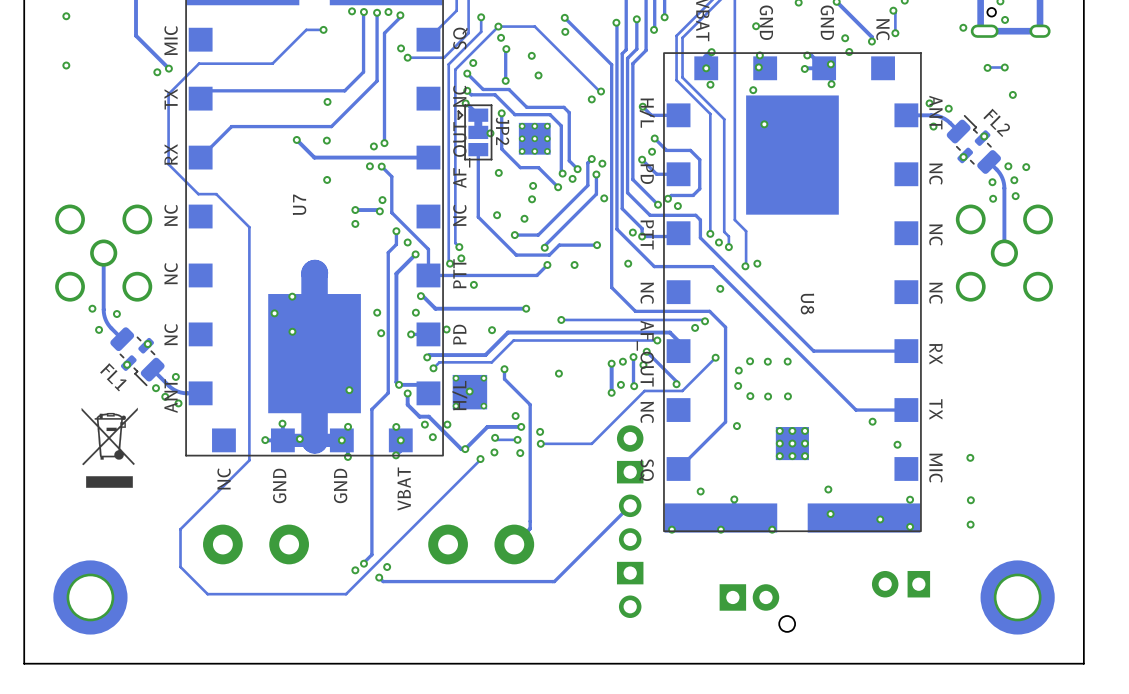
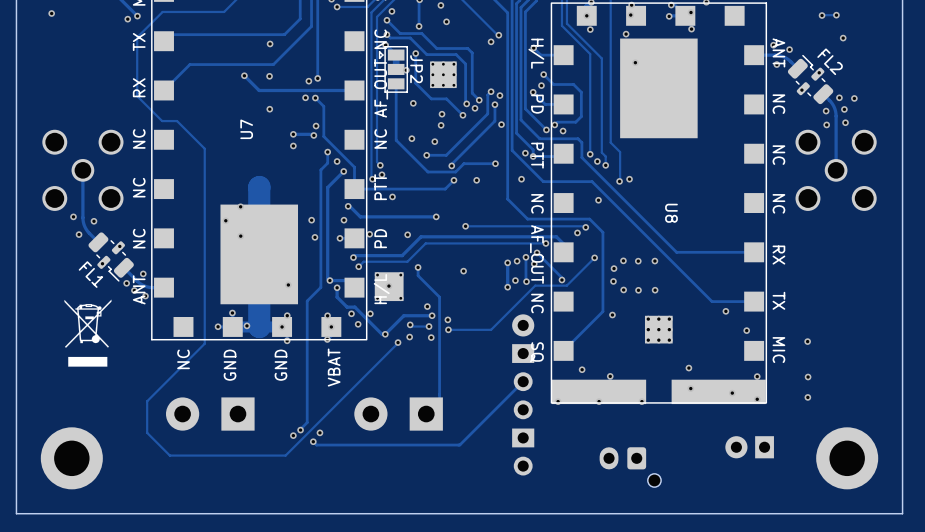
part footprint: [203, 524, 309, 565] -> [165, 397, 255, 431]
part footprint: [428, 524, 535, 565] -> [354, 397, 443, 431]
part footprint: [719, 584, 796, 632] -> [599, 447, 662, 488]

